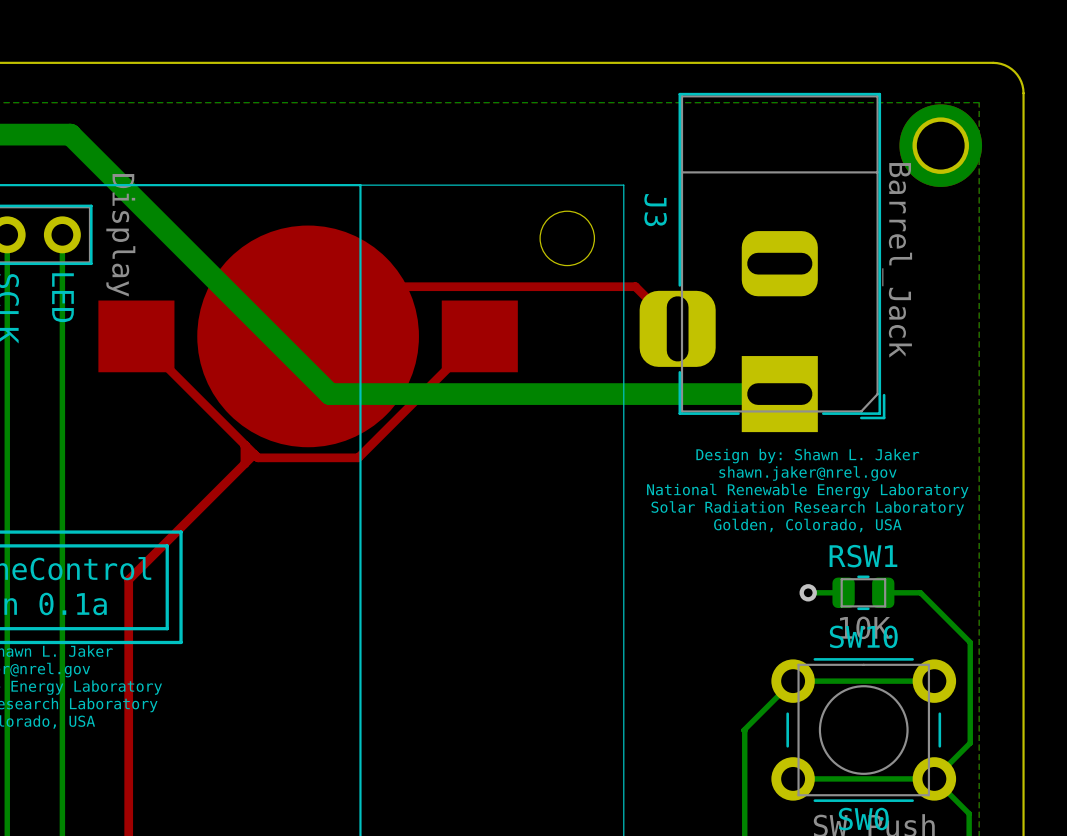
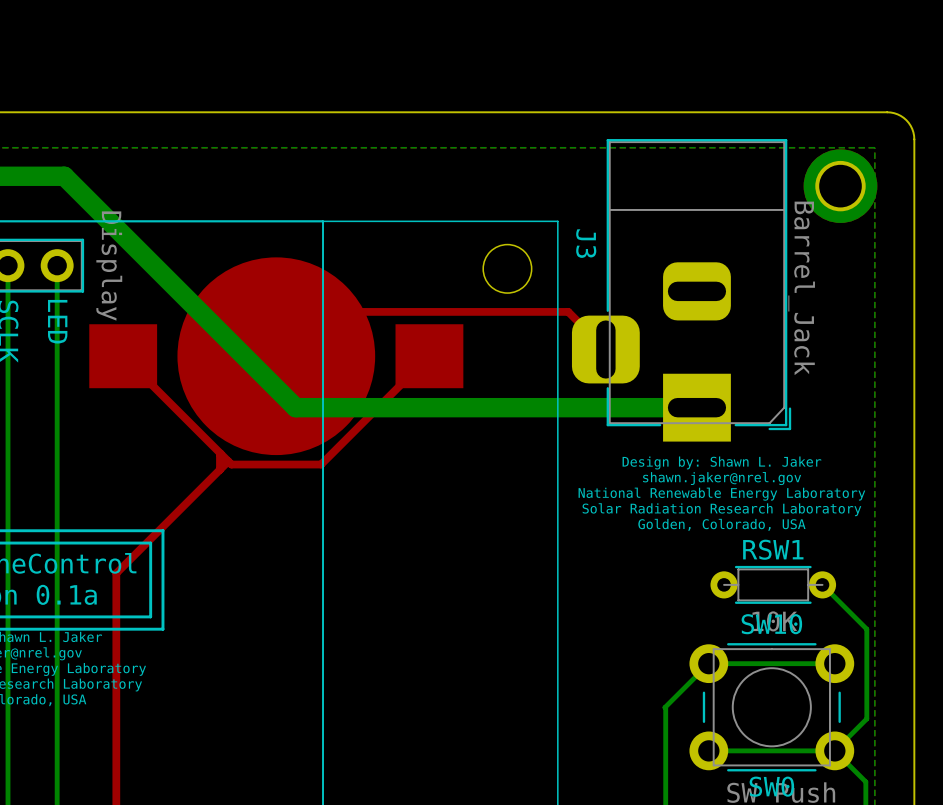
RSW1 footprint: [832, 575, 895, 611] -> [710, 565, 837, 604]
via: (808, 592) -> none
bottom track: (843, 592) (808, 592) -> none
bottom track: (920, 592) (883, 592) -> none

